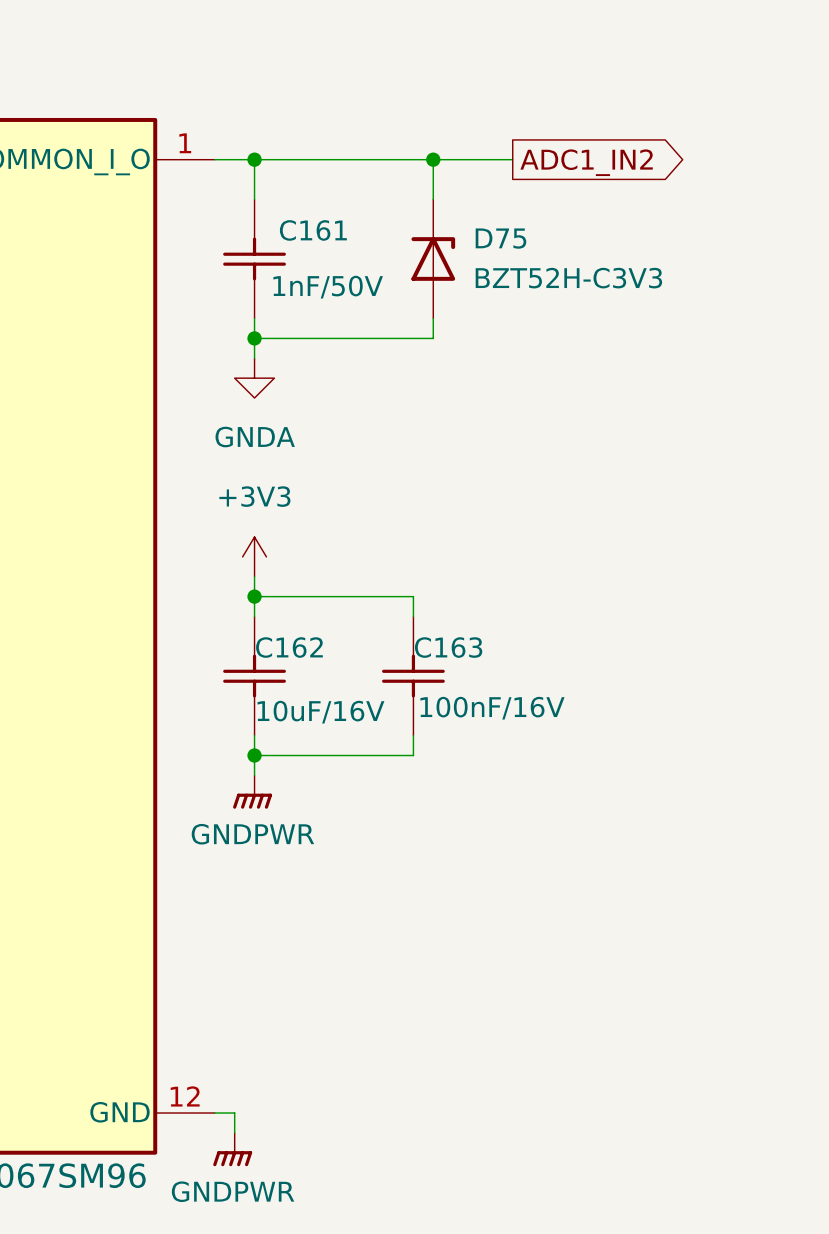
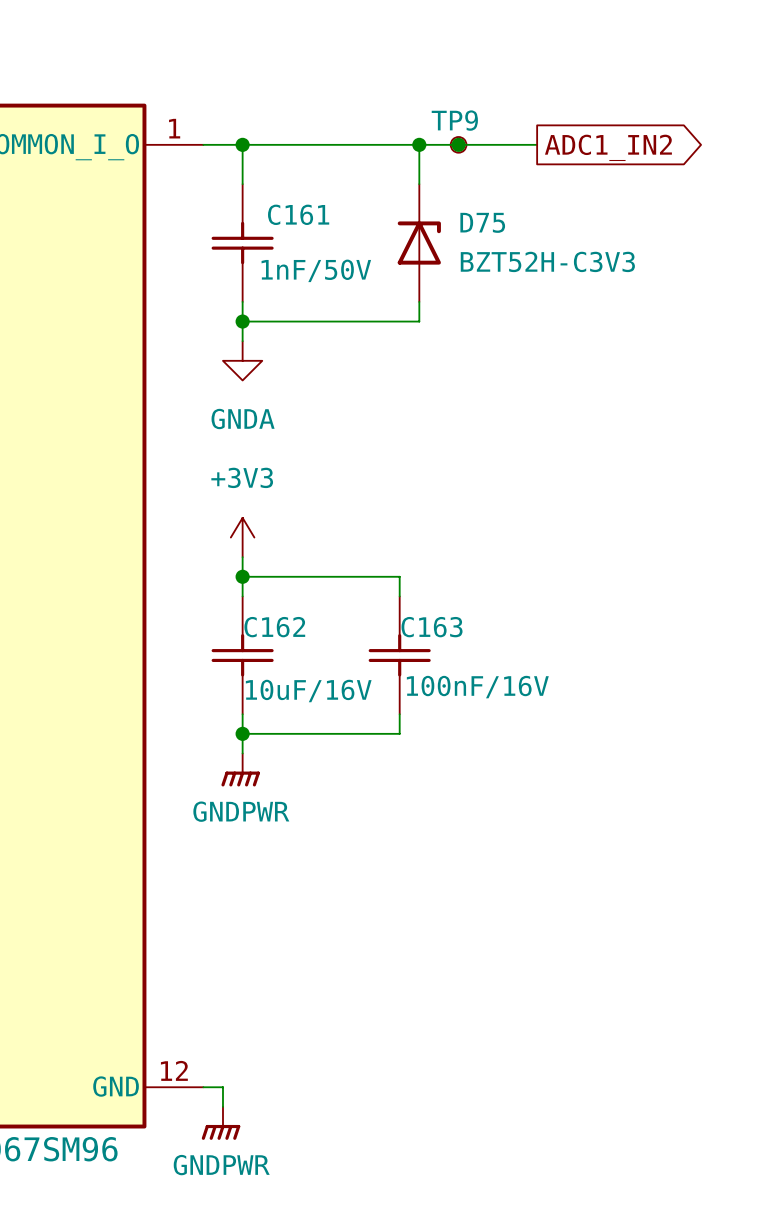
junction: none -> (458, 144)
TP9: none -> (458, 144)
wire: none -> (497, 144) (537, 144)
global label position: ADC1_IN2 (586, 162) -> ADC1_IN2 (608, 147)

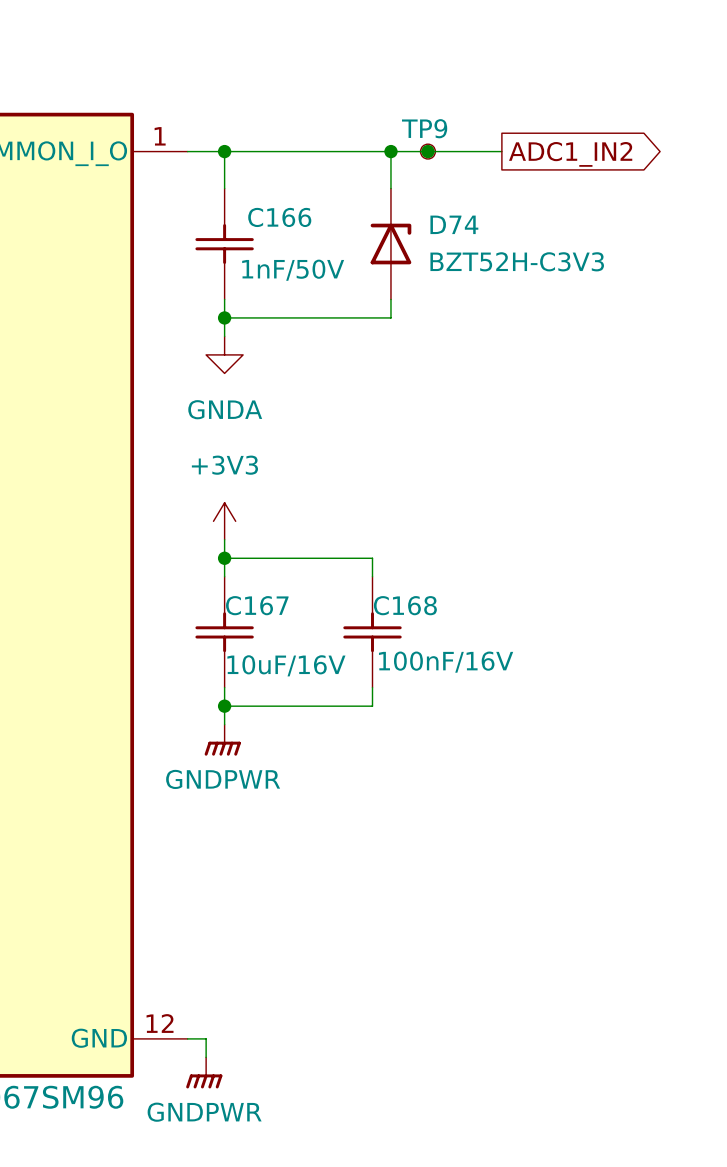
C161 name: C161 (298, 214) -> C166 (279, 217)
D75 name: D75 (482, 222) -> D74 (454, 224)
C162 name: C162 (274, 627) -> C167 (257, 605)
C163 name: C163 (432, 627) -> C168 (405, 605)

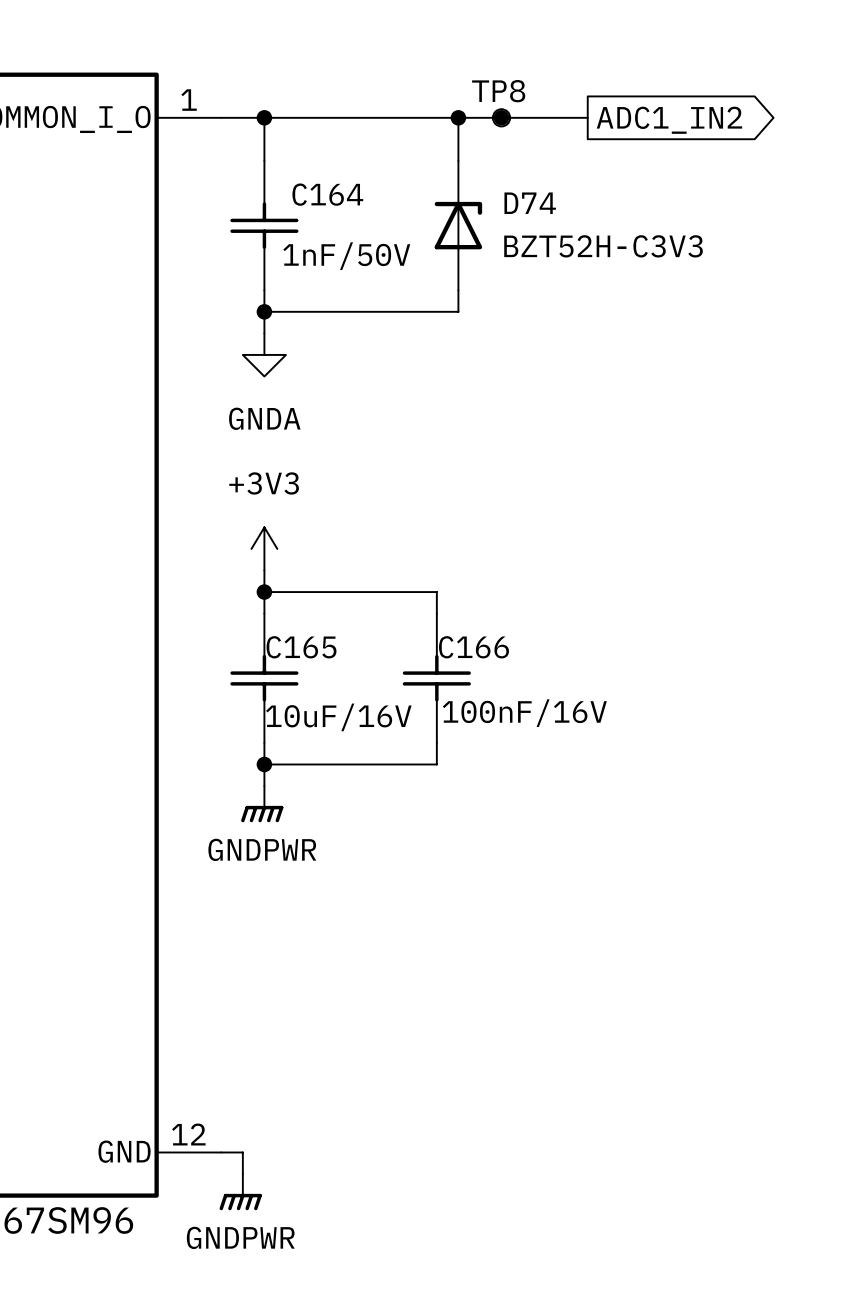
TP9 name: TP9 (424, 128) -> TP8 (498, 91)
C166 name: C166 (279, 217) -> C164 (327, 194)
C167 name: C167 (257, 605) -> C165 (301, 647)
C168 name: C168 (405, 605) -> C166 (474, 647)

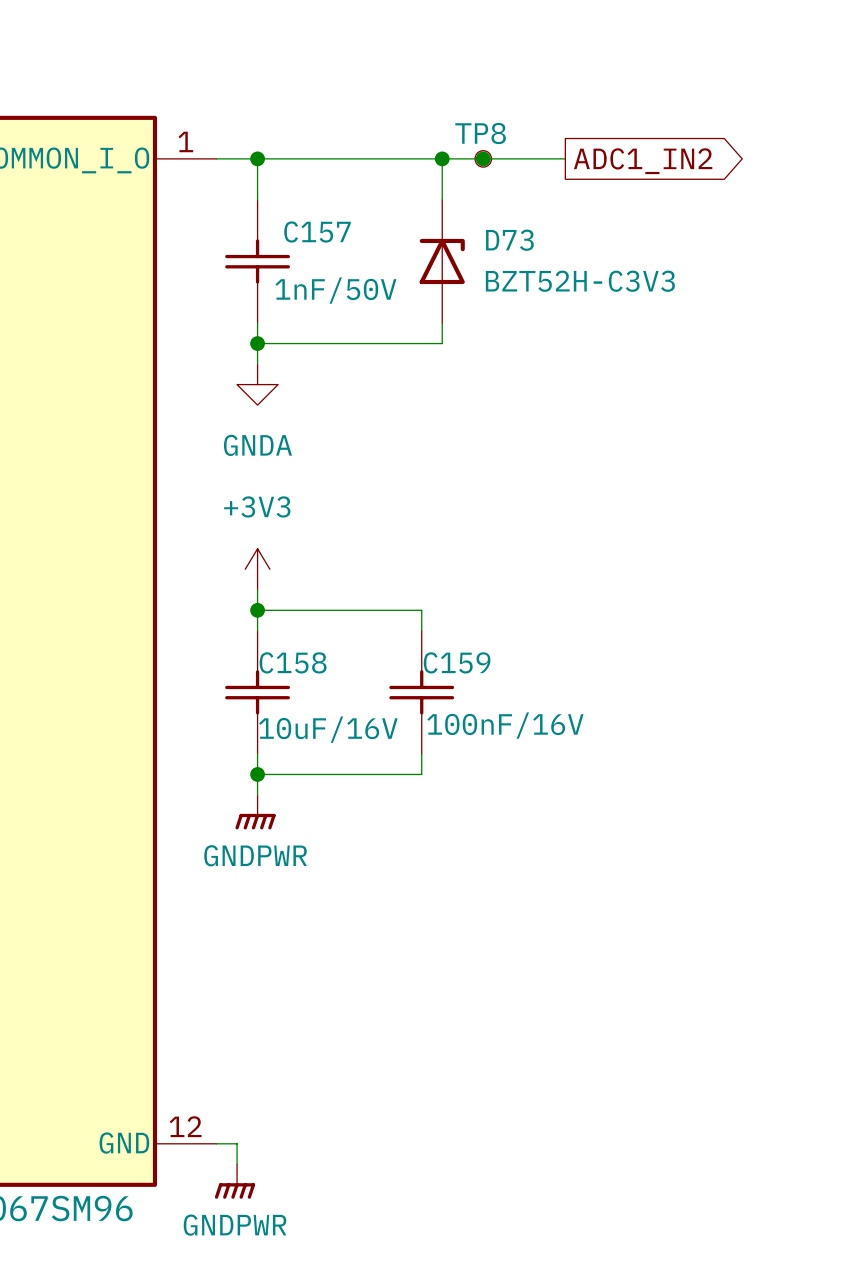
C164 name: C164 (327, 194) -> C157 (317, 231)
D74 name: D74 (530, 203) -> D73 (509, 240)
C165 name: C165 (301, 647) -> C158 (293, 662)
C166 name: C166 (474, 647) -> C159 (457, 662)

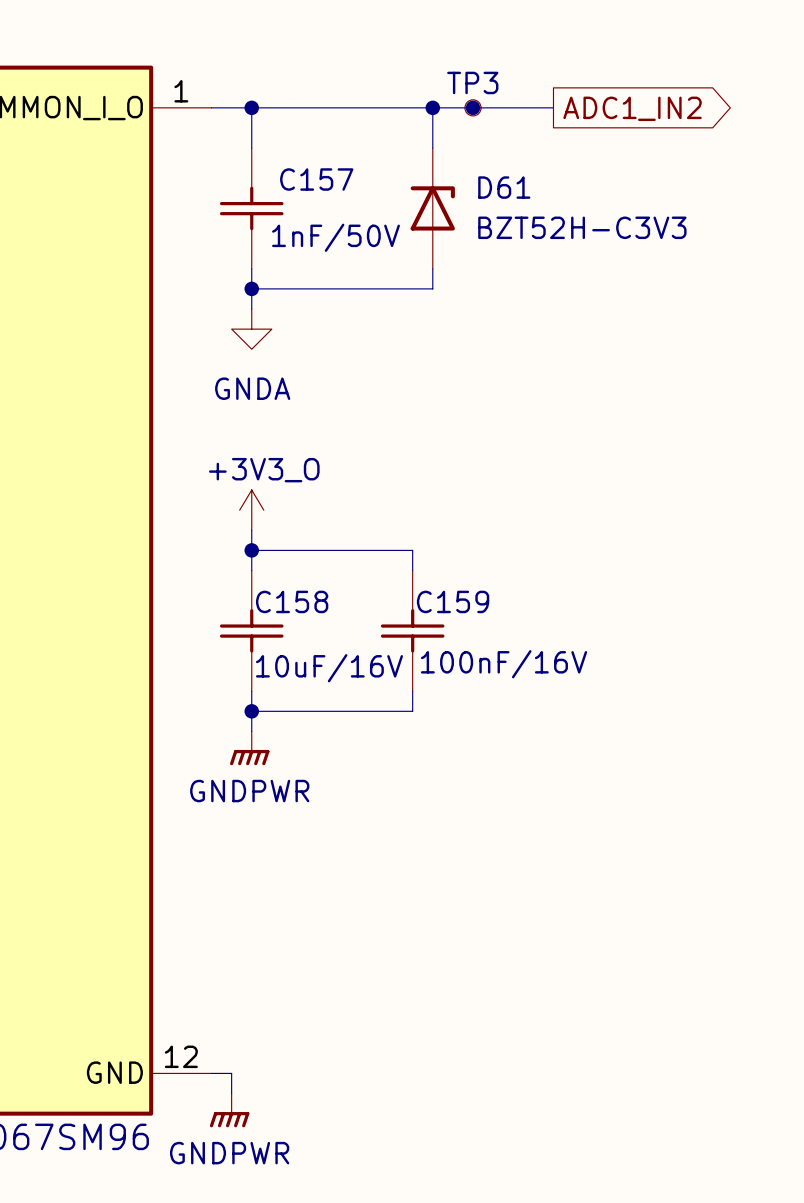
TP8 name: TP8 (480, 133) -> TP3 (472, 82)
D73 name: D73 (509, 240) -> D61 (504, 187)
power symbol: +3V3 (257, 569) -> +3V3_O (251, 510)

